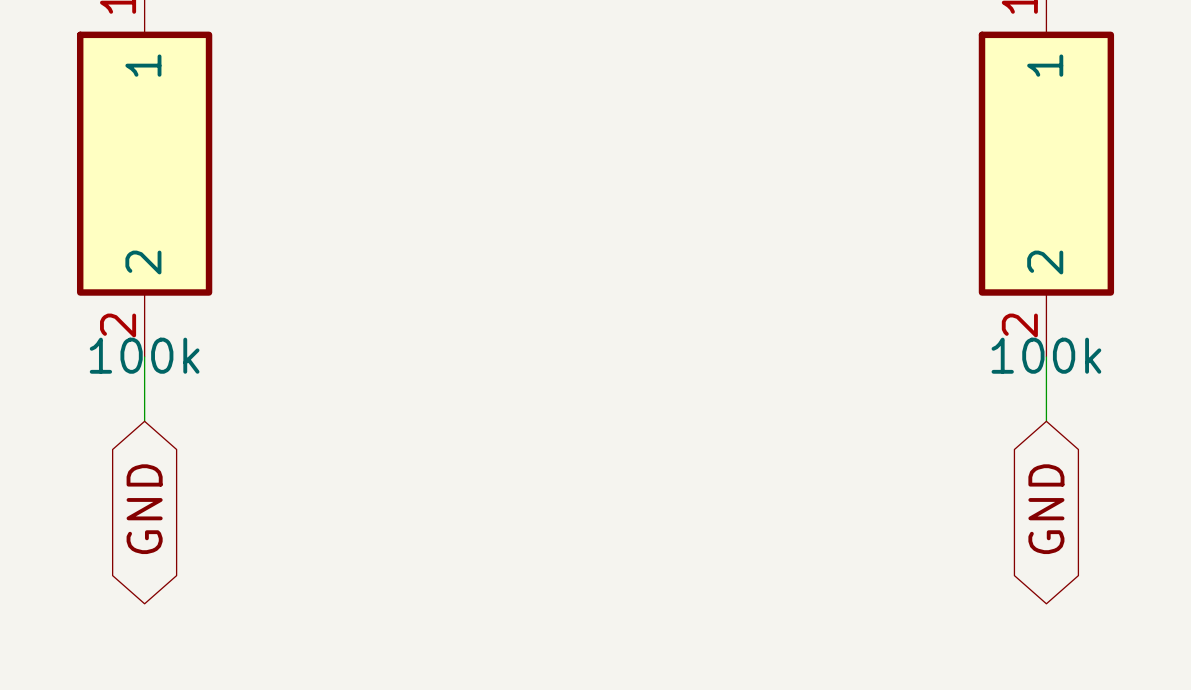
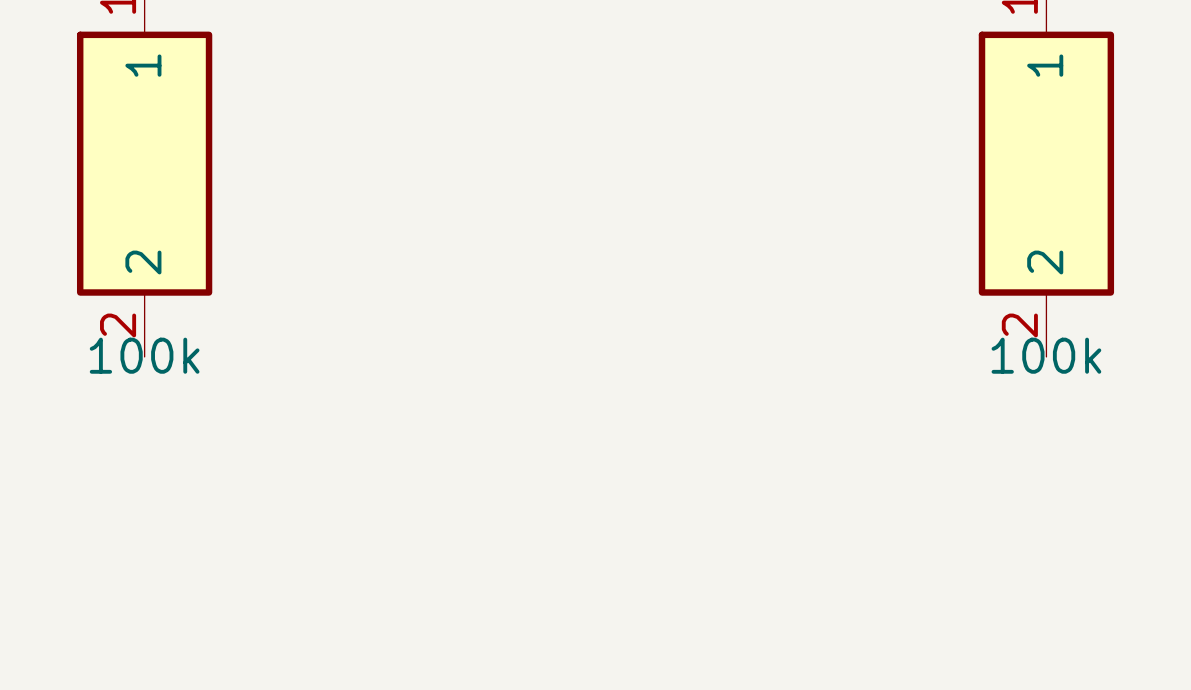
wire: (144, 356) (144, 421) -> none
wire: (1046, 356) (1046, 421) -> none
global label: GND (144, 509) -> none
global label: GND (1046, 509) -> none

